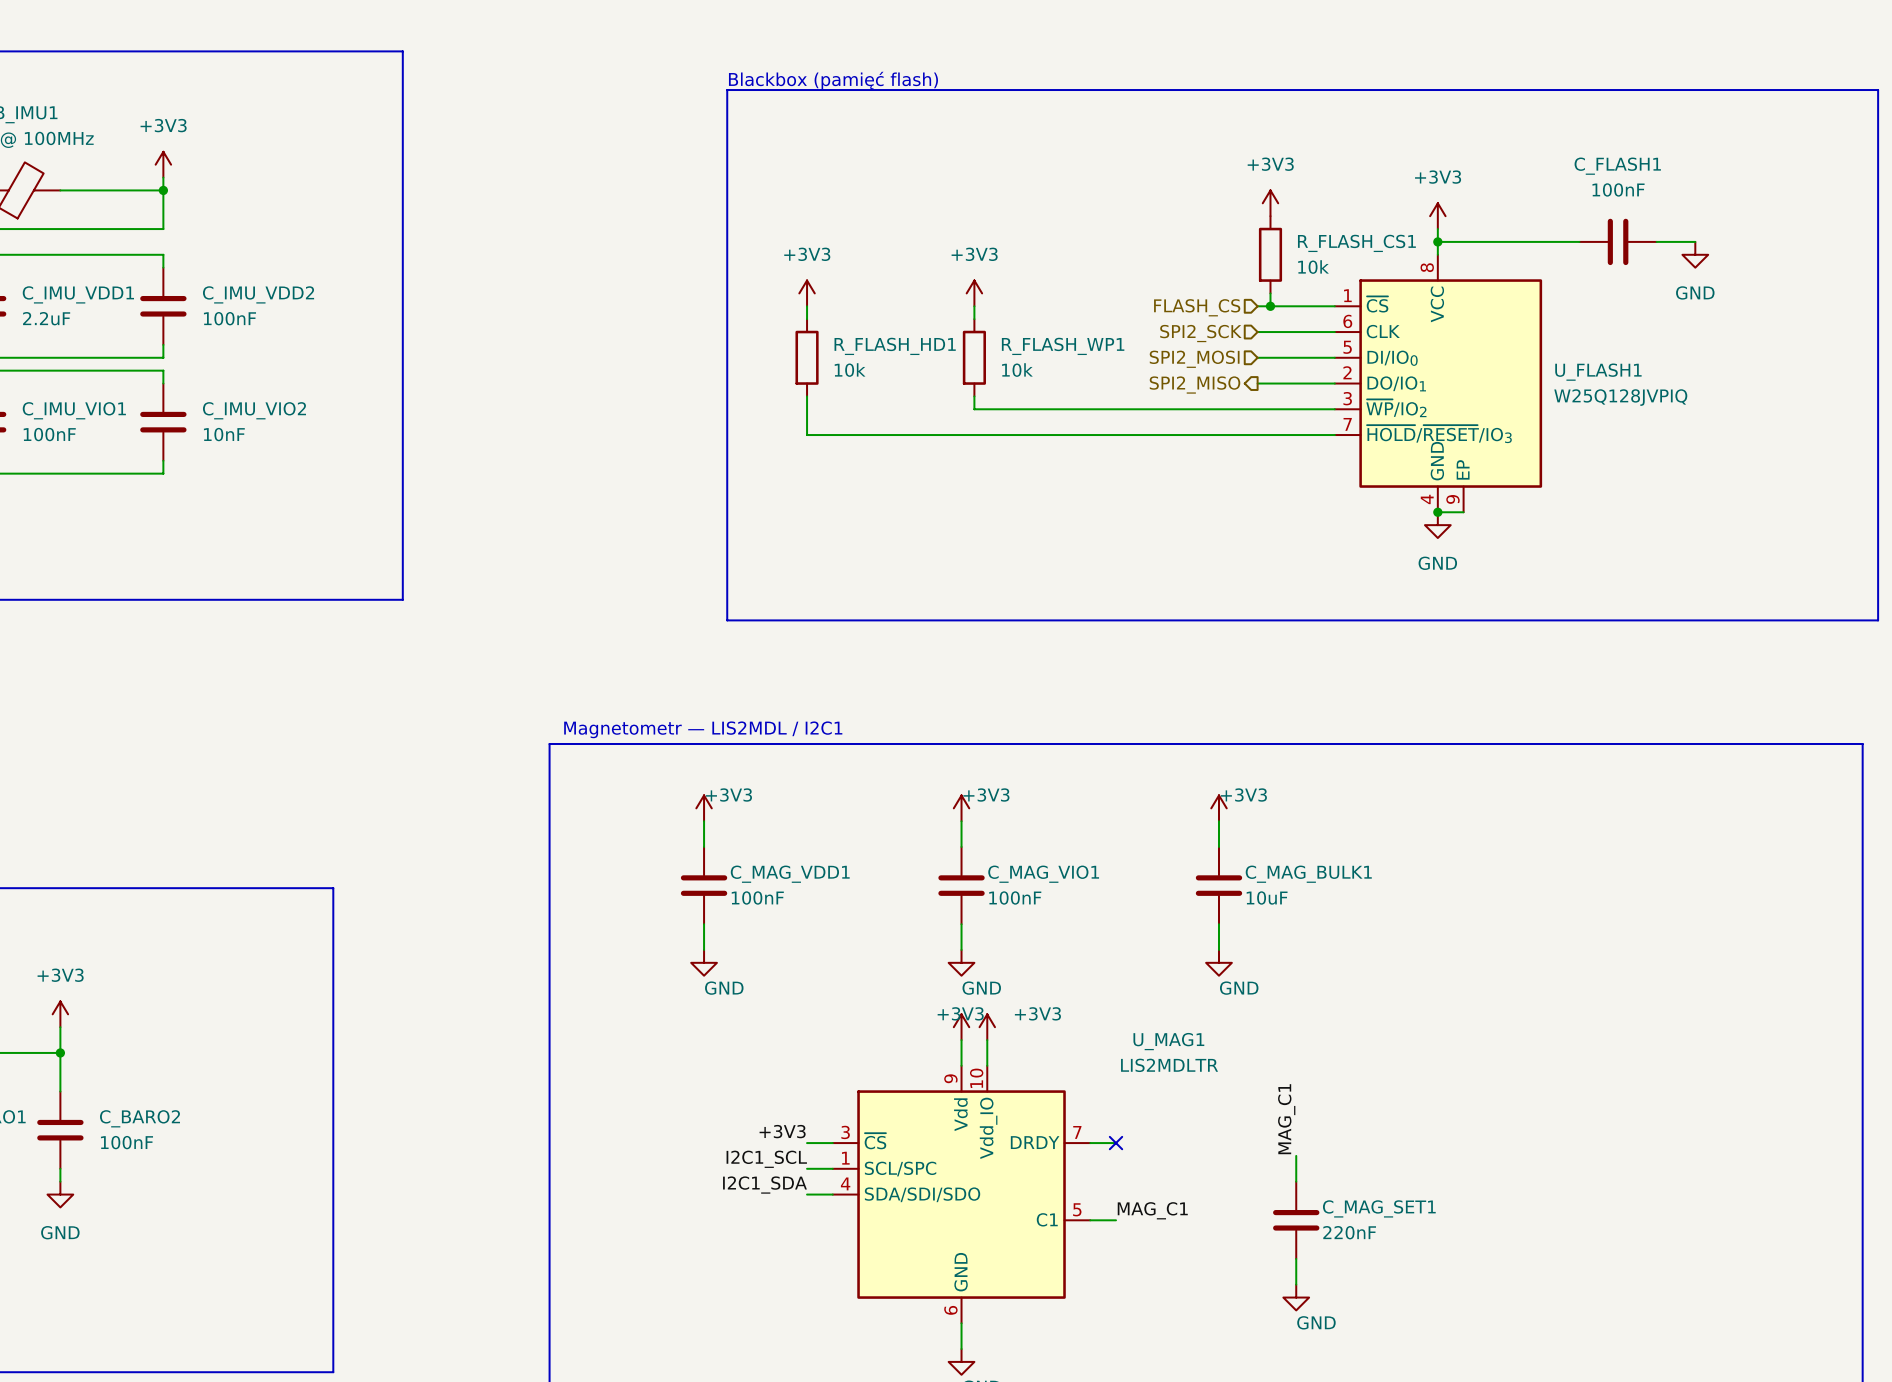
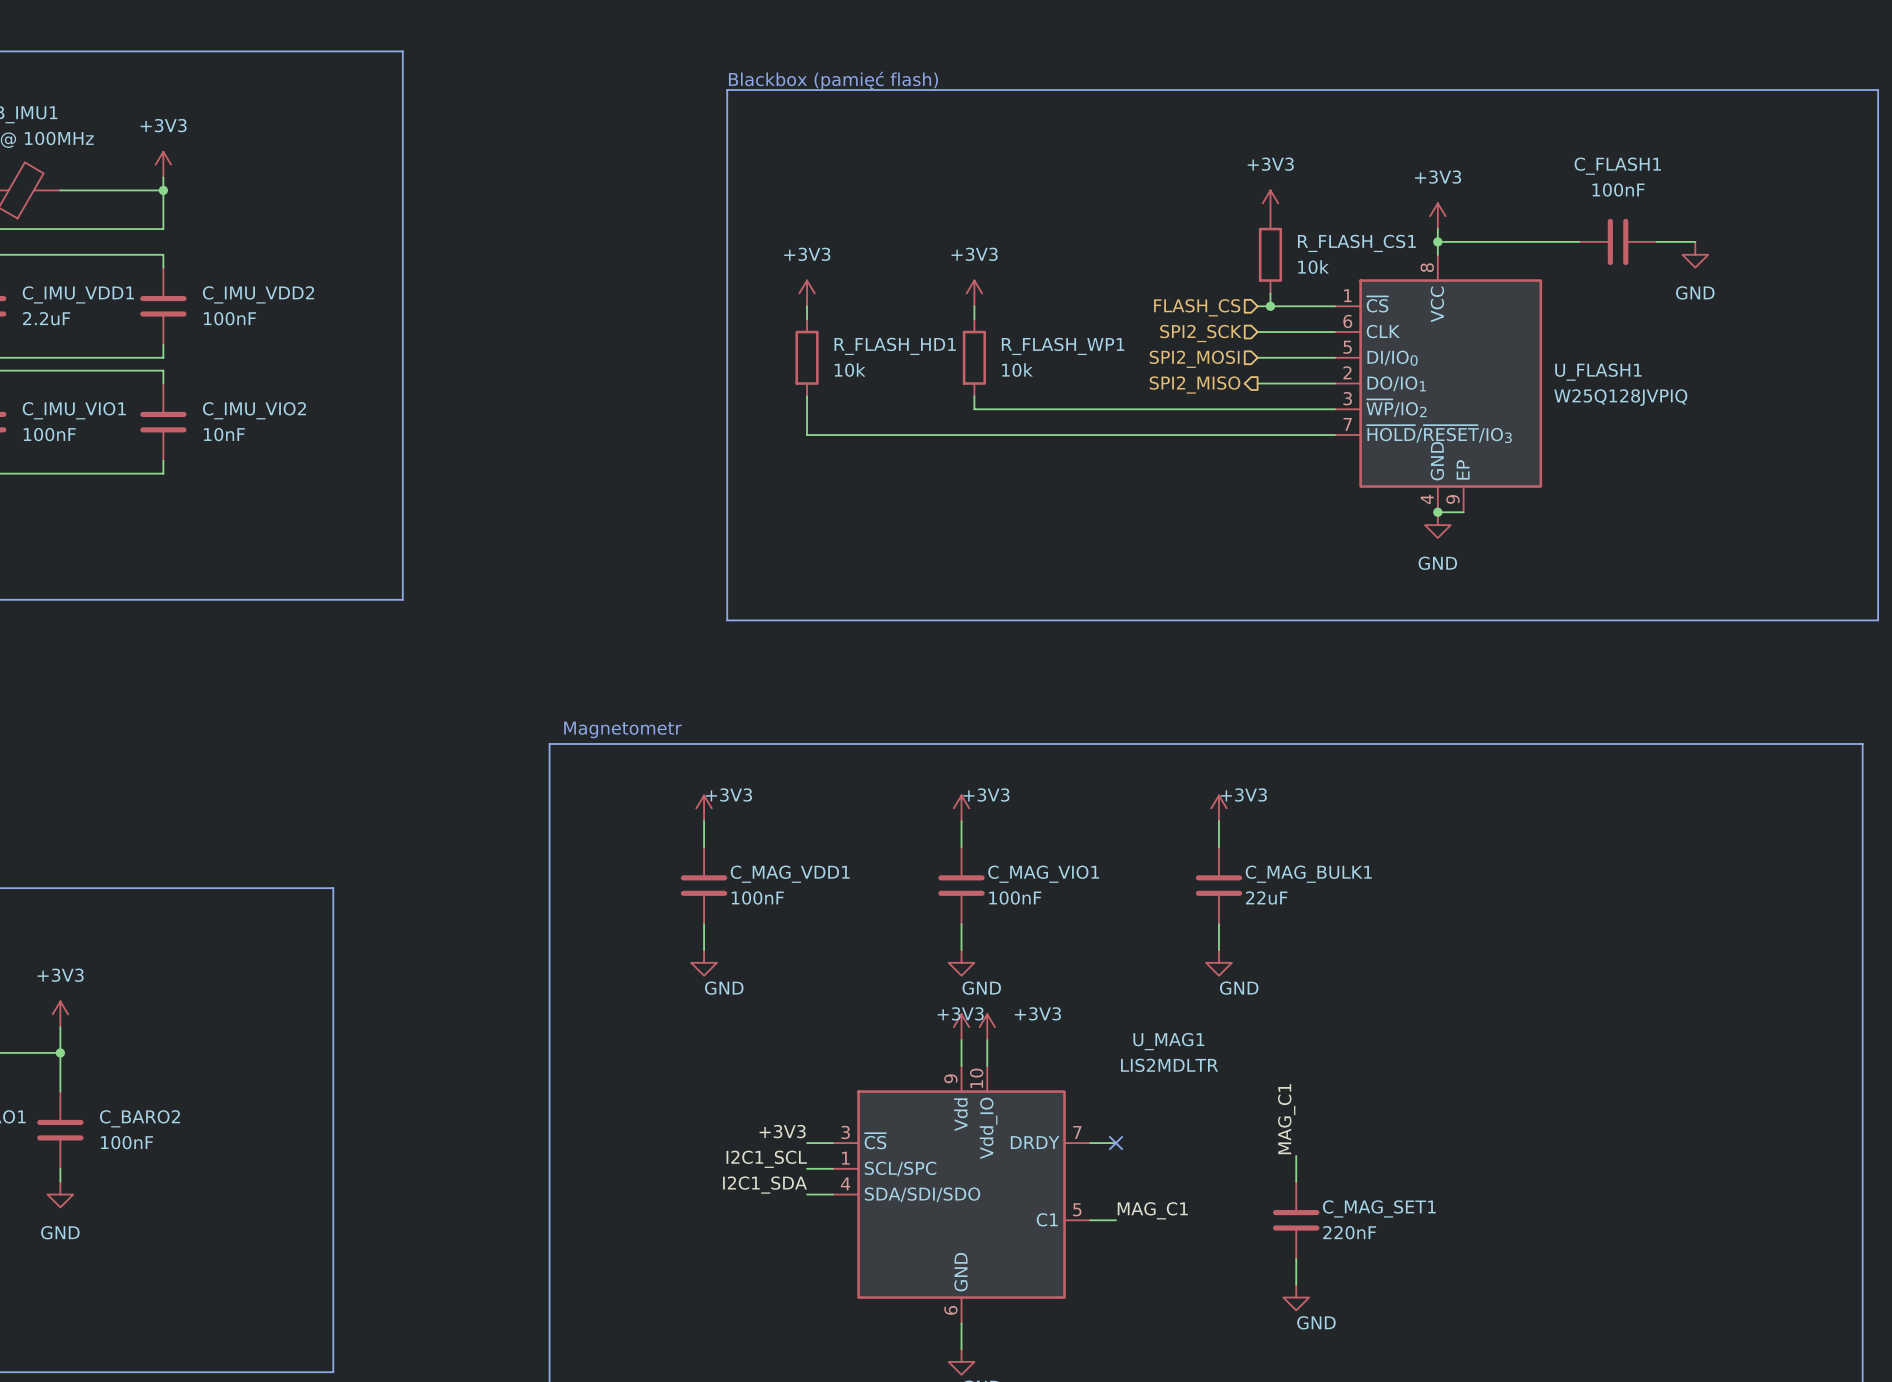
text: Magnetometr — LIS2MDL / I2C1 (703, 729) -> Magnetometr (622, 729)
C_MAG_BULK1 value: 10uF (1267, 897) -> 22uF (1266, 897)

